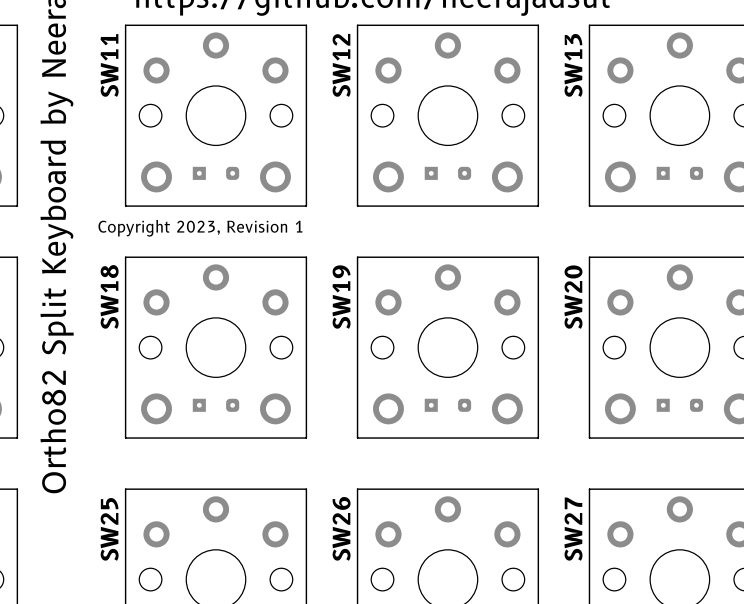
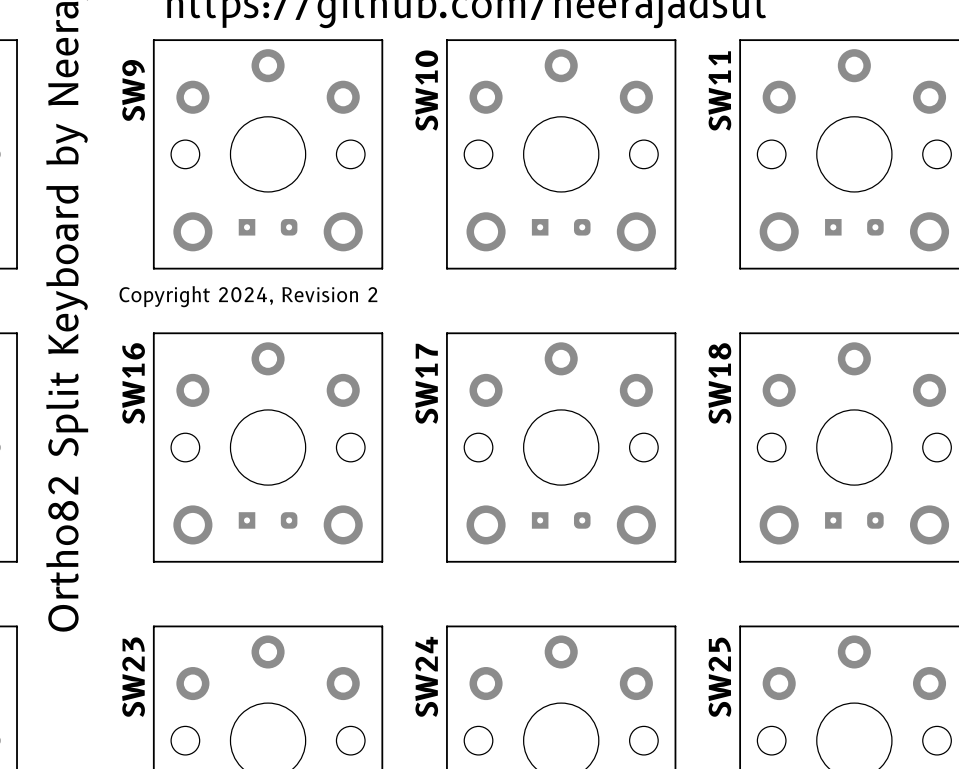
SW11 name: SW11 (109, 65) -> SW9 (133, 90)
SW12 name: SW12 (341, 65) -> SW10 (426, 90)
SW13 name: SW13 (573, 65) -> SW11 (719, 90)
text: Copyright 2023, Revision 1 (200, 228) -> Copyright 2024, Revision 2 (248, 296)
SW18 name: SW18 (109, 296) -> SW16 (133, 383)
SW19 name: SW19 (341, 297) -> SW17 (426, 383)
SW20 name: SW20 (573, 297) -> SW18 (719, 383)
SW26 name: SW26 (341, 528) -> SW24 (426, 676)
SW25 name: SW25 (109, 529) -> SW23 (133, 677)
SW27 name: SW27 (573, 529) -> SW25 (719, 677)

